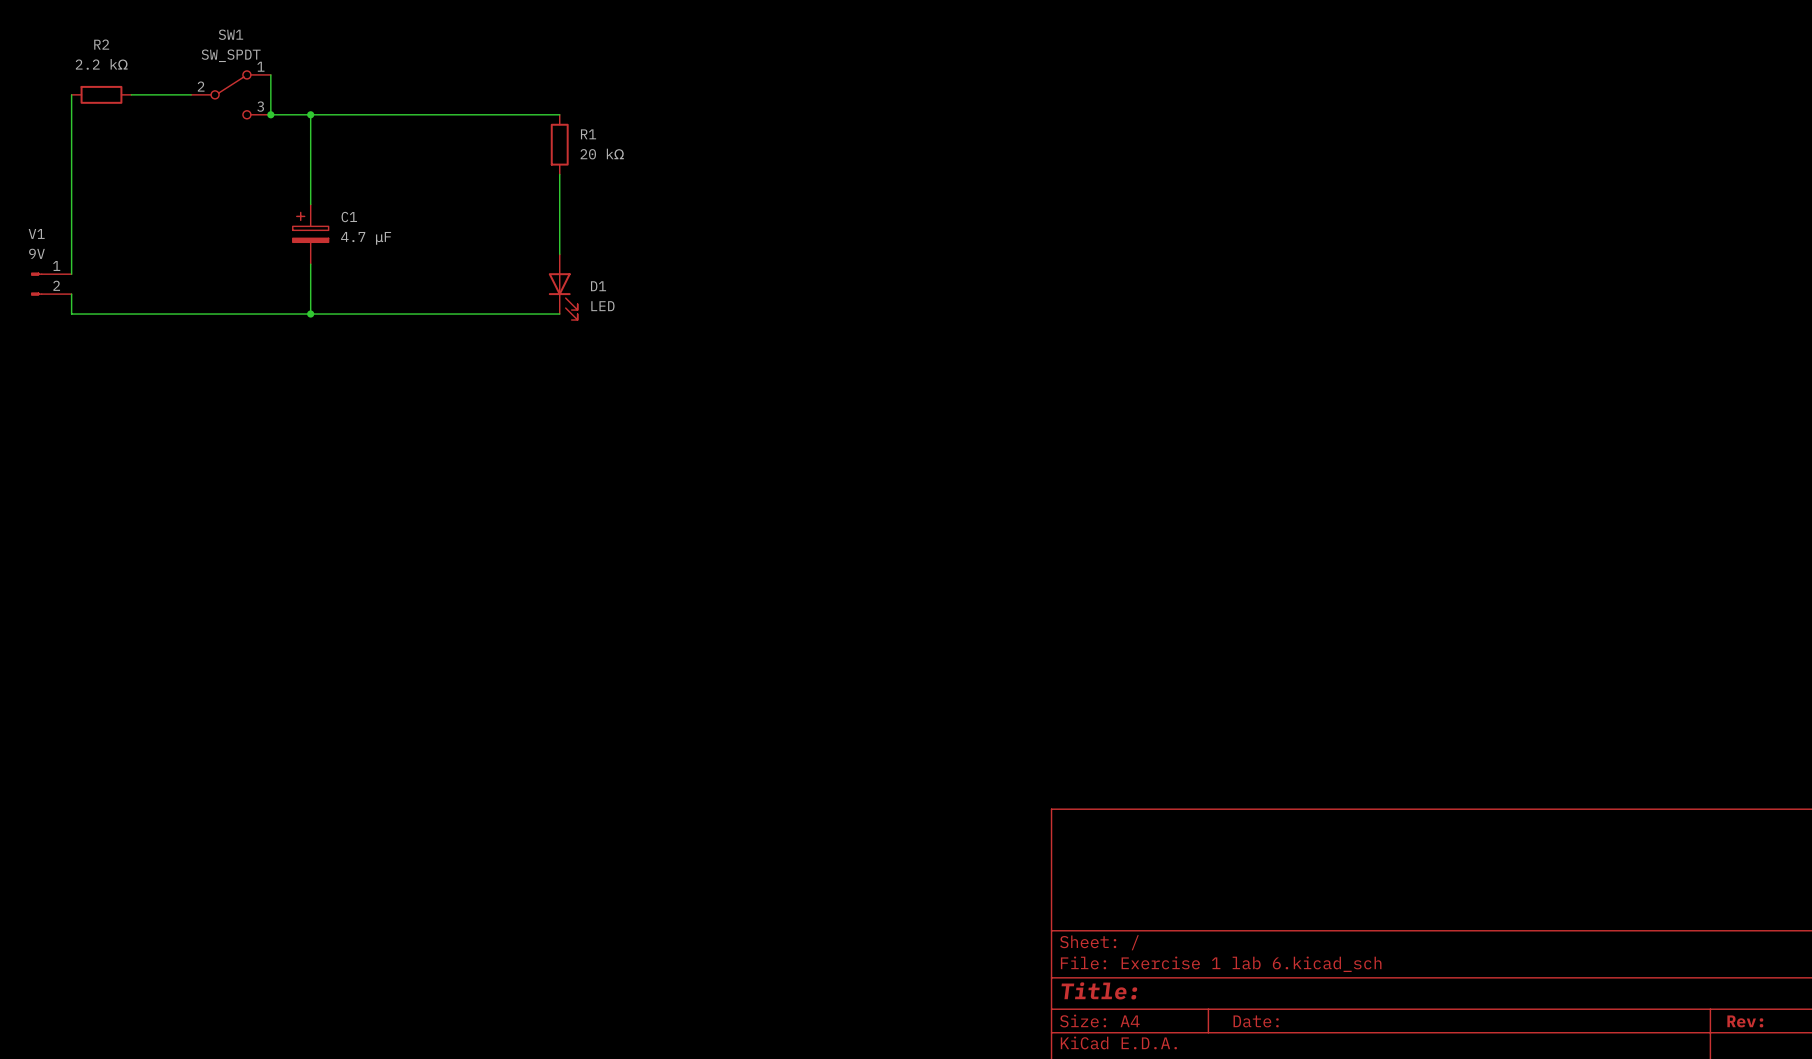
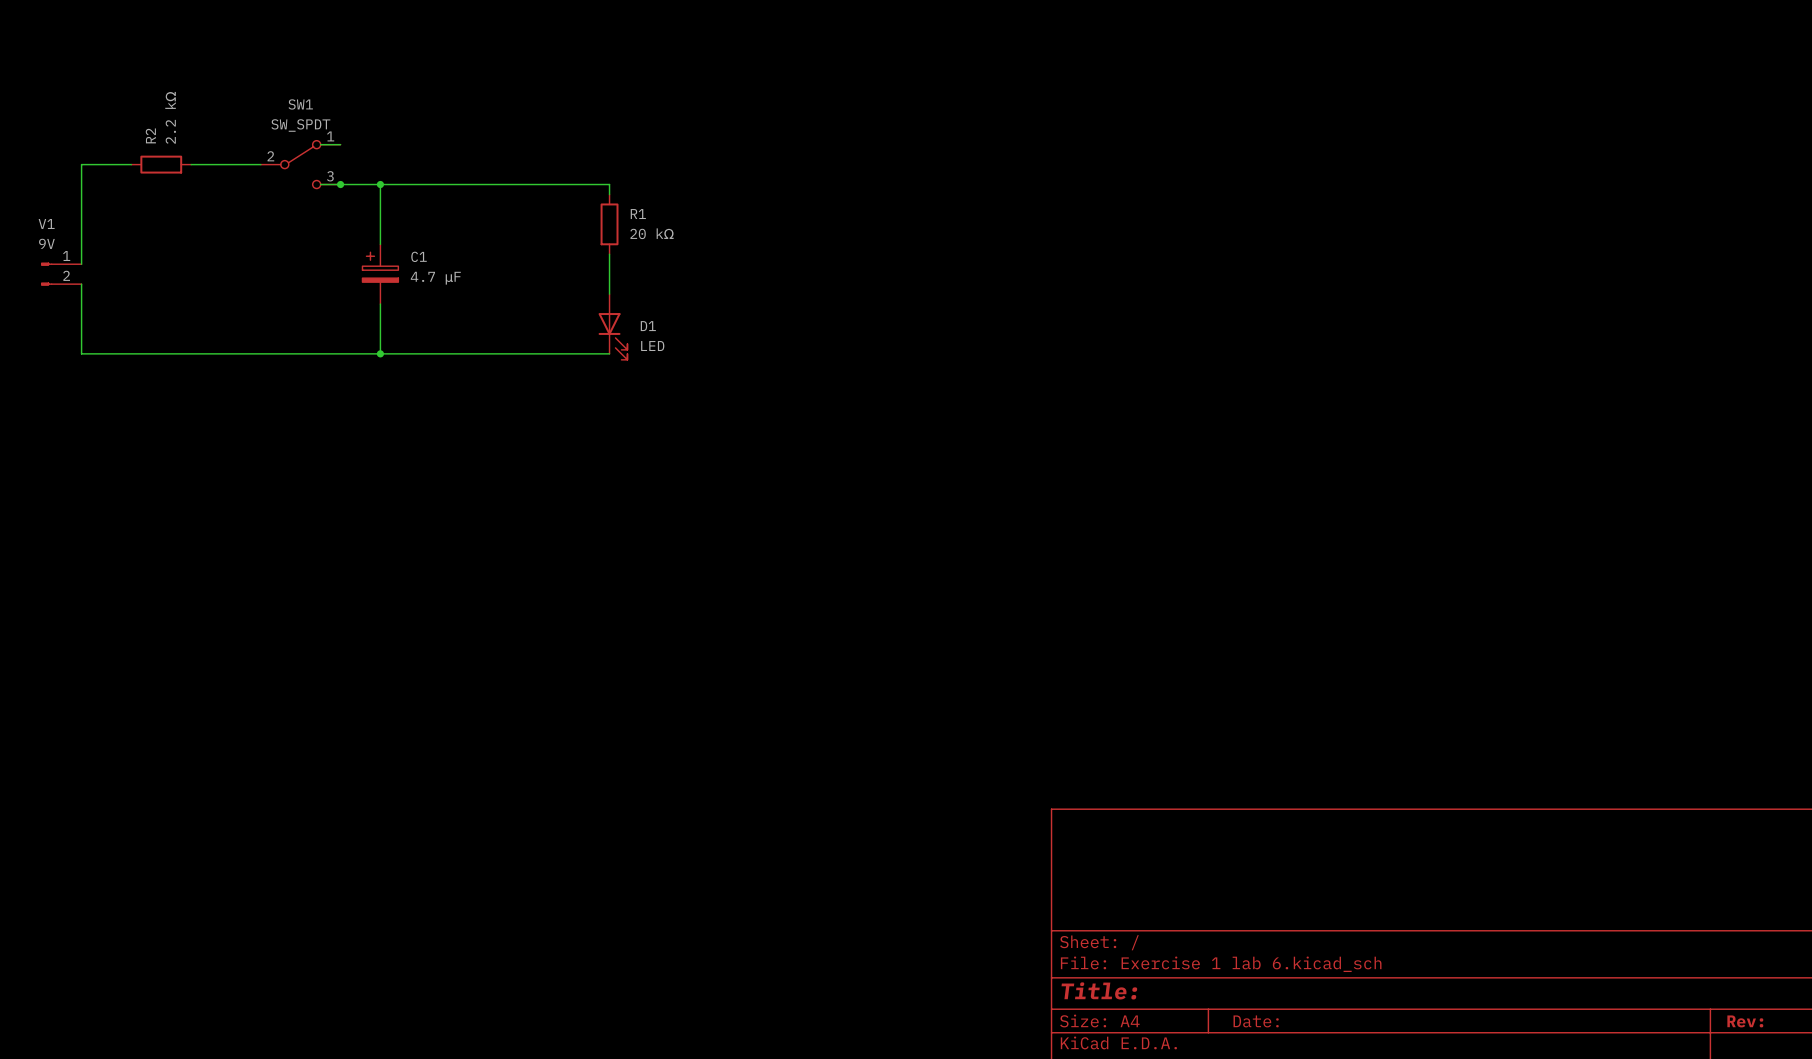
R2 name rotation: 0° (101, 44) -> 90° counterclockwise (150, 135)
R2 value rotation: 0° (101, 64) -> 90° counterclockwise (170, 117)
wire: (270, 74) (270, 114) (559, 114) -> none
wire: (71, 94) (71, 274) -> none
R2 position: (101, 94) -> (161, 164)
wire: (131, 94) (191, 94) -> none
SW1 position: (230, 94) -> (300, 164)
junction: (270, 114) -> none
wire: (310, 114) (310, 204) -> none
junction: (310, 114) -> none
wire: none -> (320, 144) (340, 144)
R1 position: (559, 144) -> (609, 224)
wire: none -> (131, 164) (81, 164) (81, 264)
wire: none -> (191, 164) (260, 164)
wire: (559, 174) (559, 254) -> none
wire: none -> (320, 184) (609, 184) (609, 194)
junction: none -> (340, 184)
wire: none -> (380, 184) (380, 244)
junction: none -> (380, 184)
C1 position: (310, 234) -> (380, 274)
wire: none -> (609, 254) (609, 294)
wire: (310, 264) (310, 314) -> (380, 304) (380, 353)
V1 position: (51, 284) -> (61, 274)
wire: none -> (81, 284) (81, 353) (609, 353)
D1 position: (563, 287) -> (613, 326)
wire: (71, 294) (71, 314) (559, 314) -> none
junction: (310, 314) -> none
junction: none -> (380, 353)

